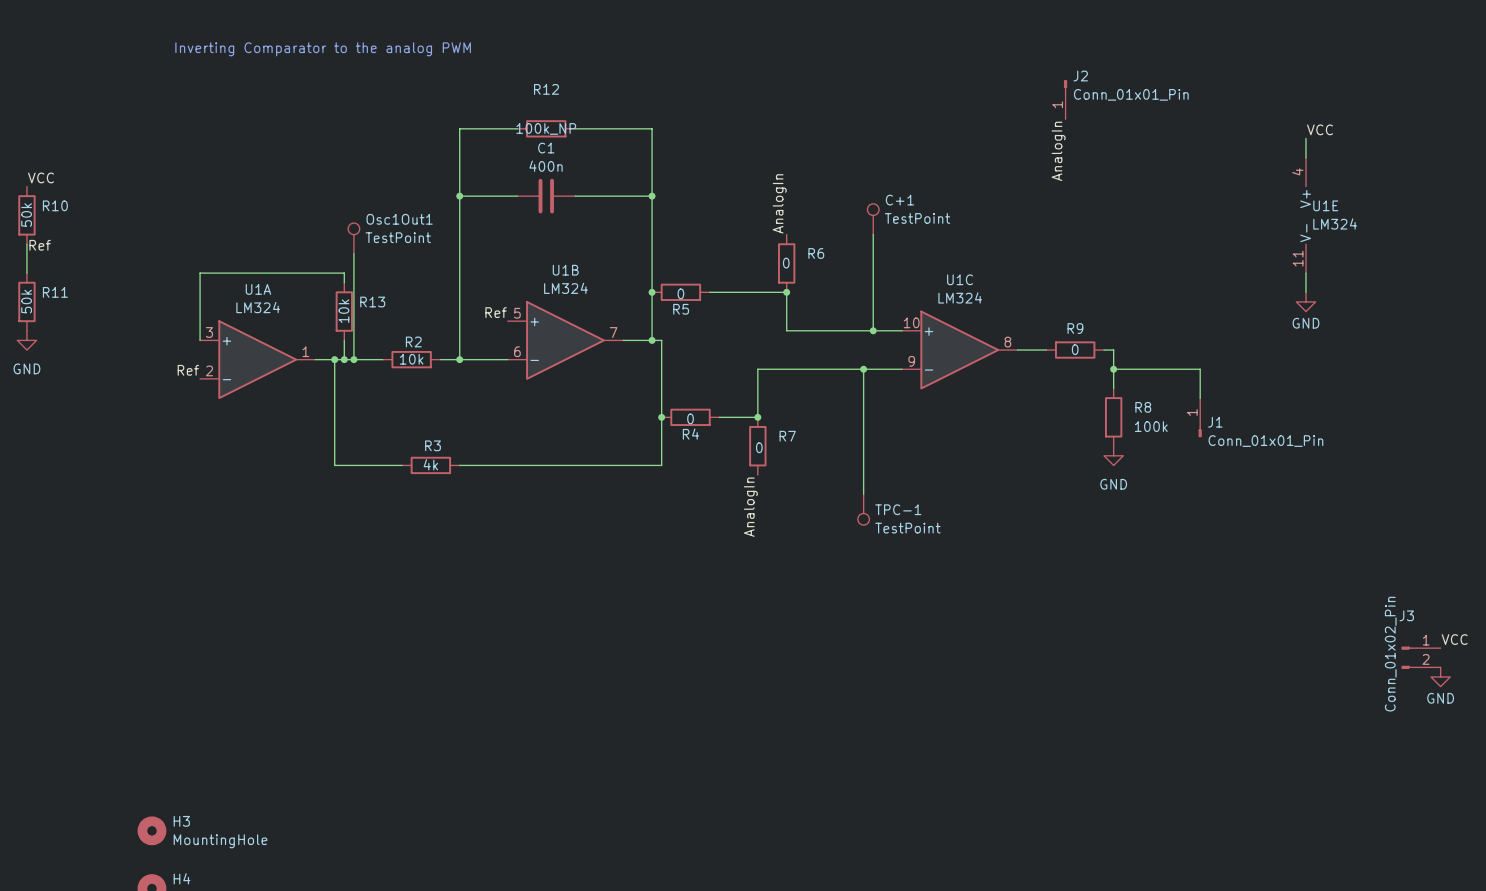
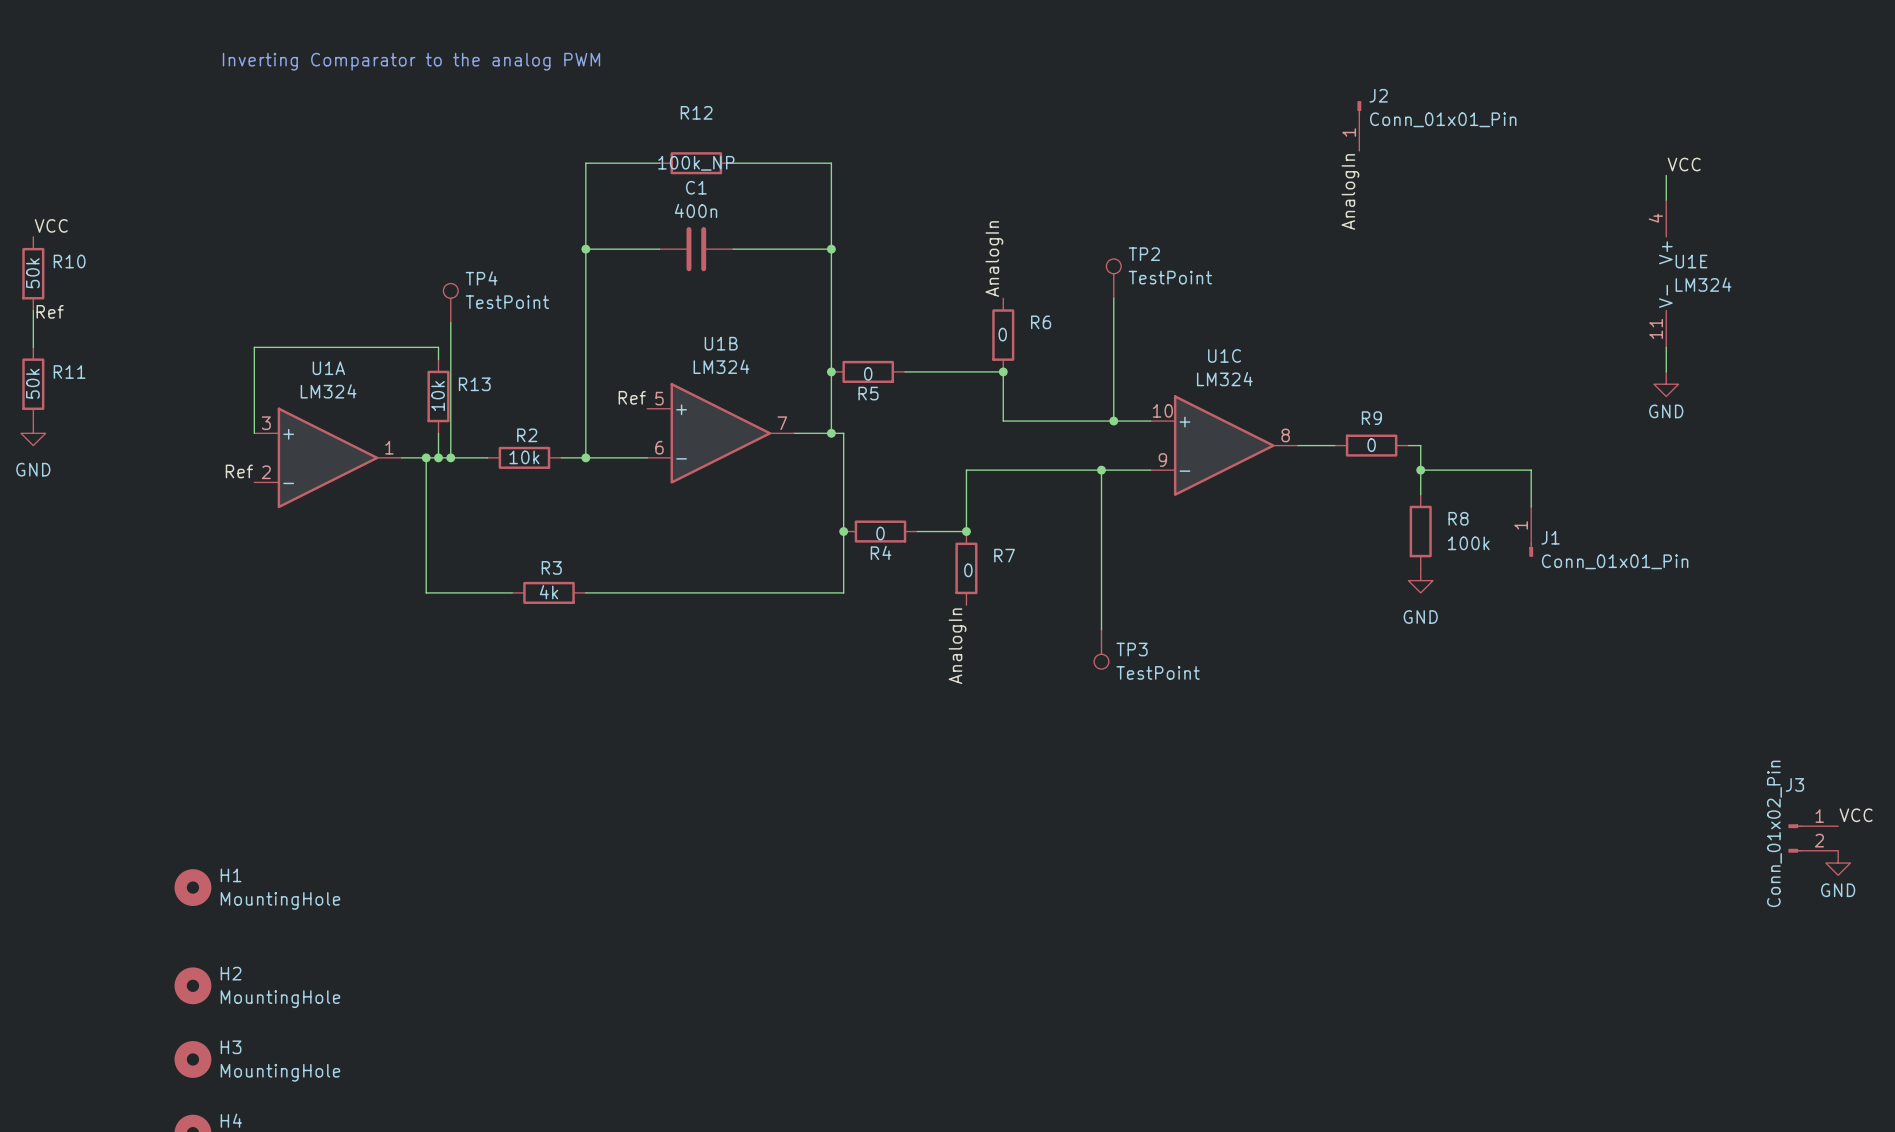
C+1 name: C+1 (899, 200) -> TP2 (1144, 254)
Osc1Out1 name: Osc1Out1 (399, 219) -> TP4 (481, 278)
TPC-1 name: TPC-1 (898, 509) -> TP3 (1132, 649)
H1: none -> MountingHole (192, 887)
H2: none -> MountingHole (192, 985)

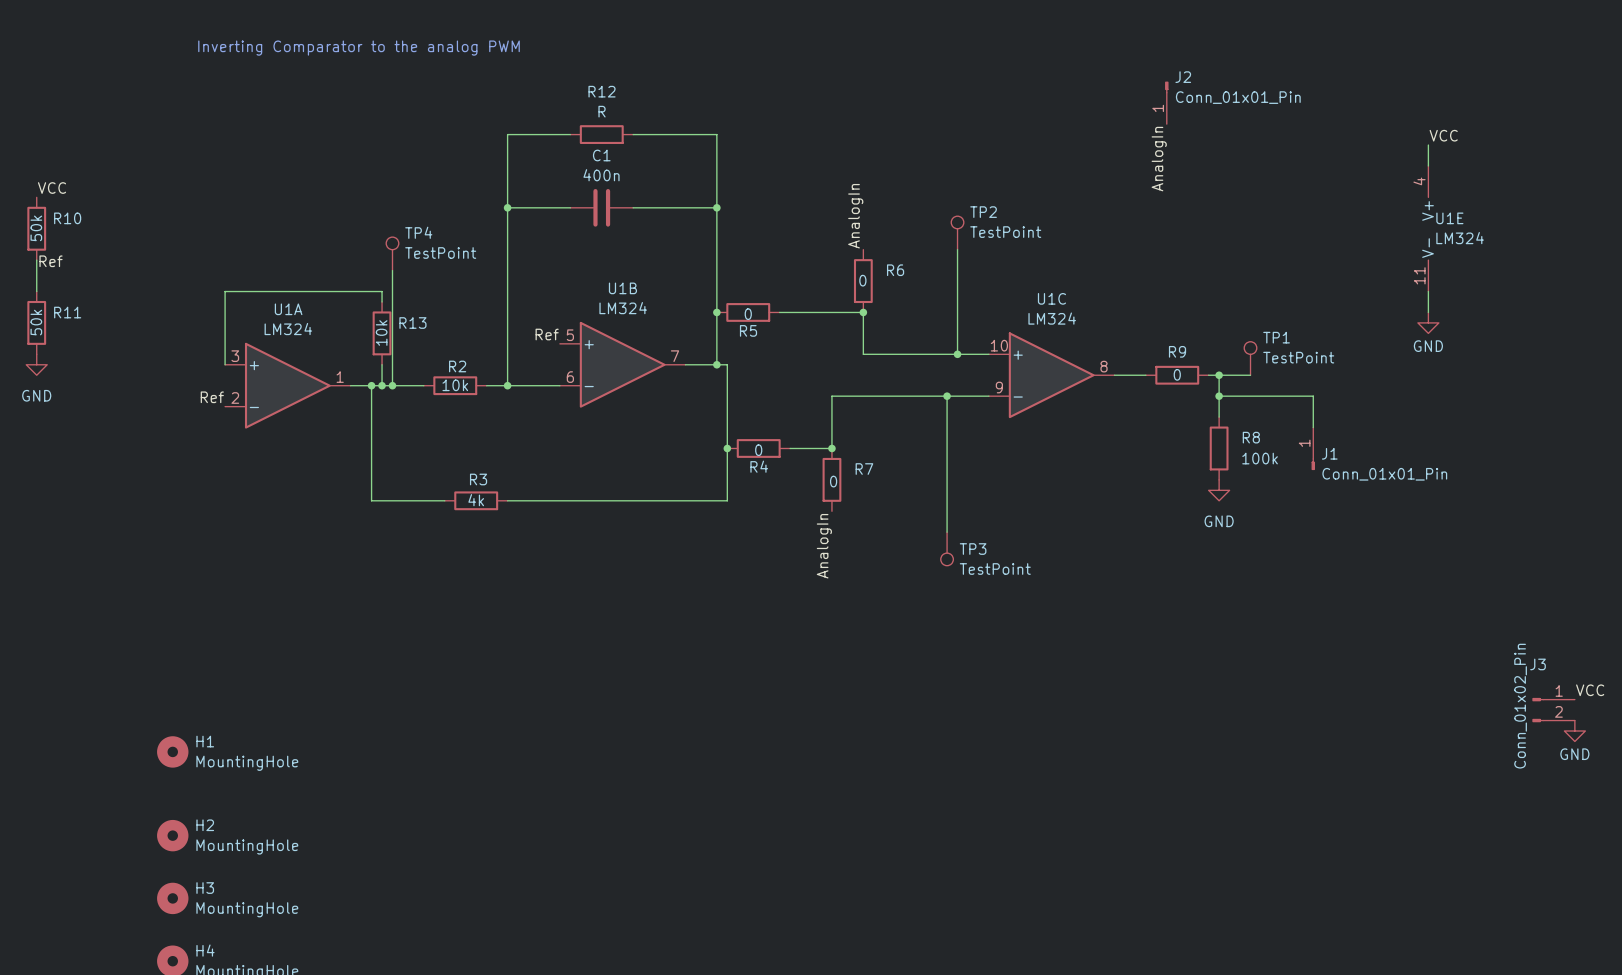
R12 value: 100k_NP (696, 163) -> R (602, 111)
TP1: none -> TestPoint (1250, 358)
wire: none -> (1219, 375) (1250, 375)
junction: none -> (1219, 375)

